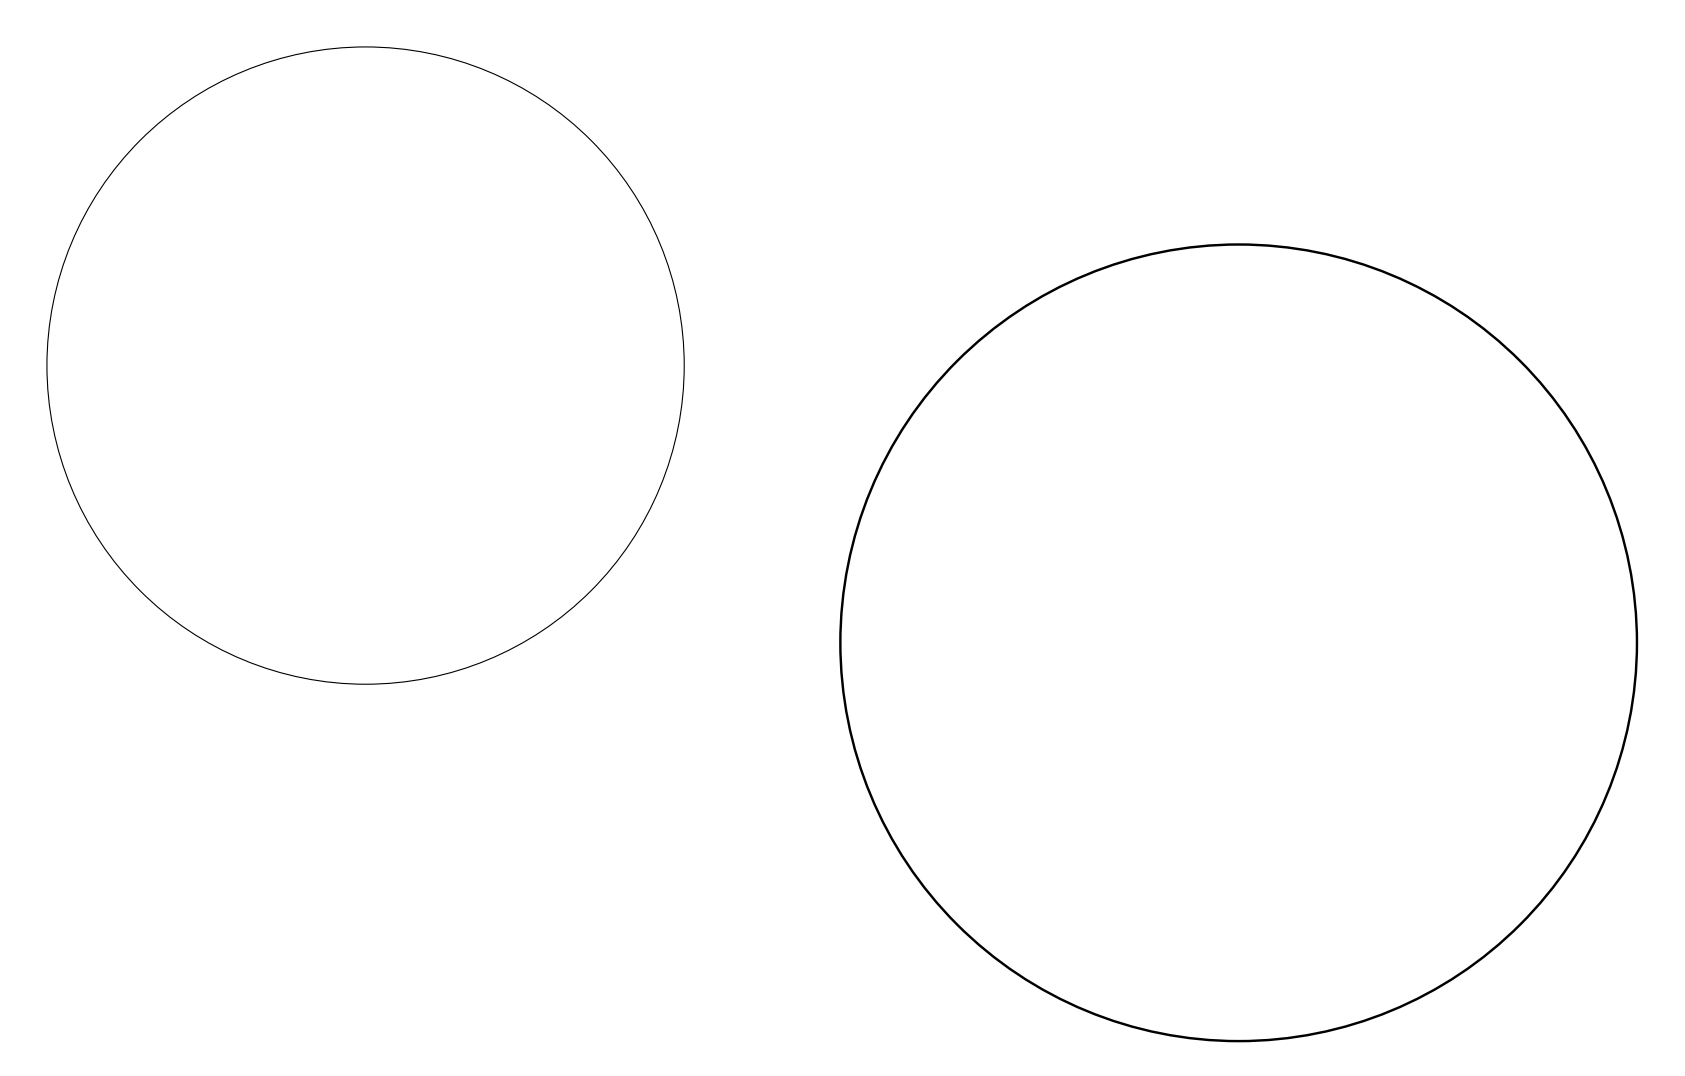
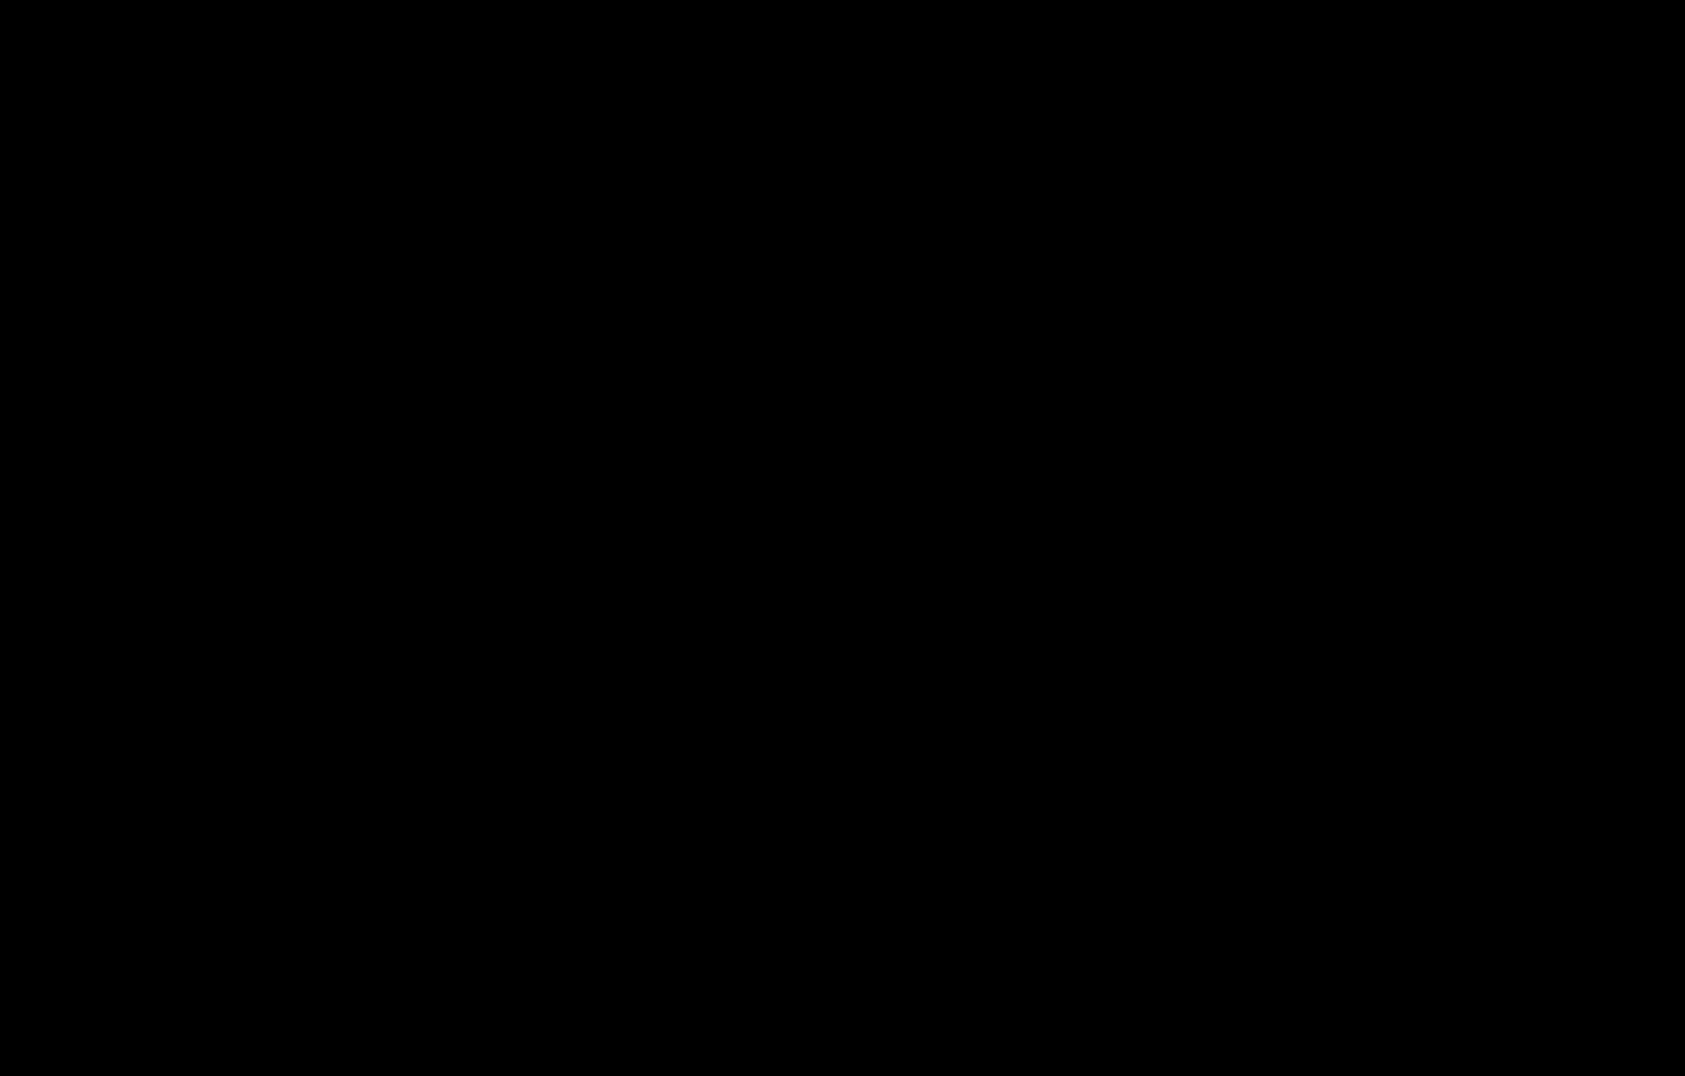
round board edge: [46, 46, 685, 685] -> none
round board edge: [839, 243, 1639, 1043] -> none

